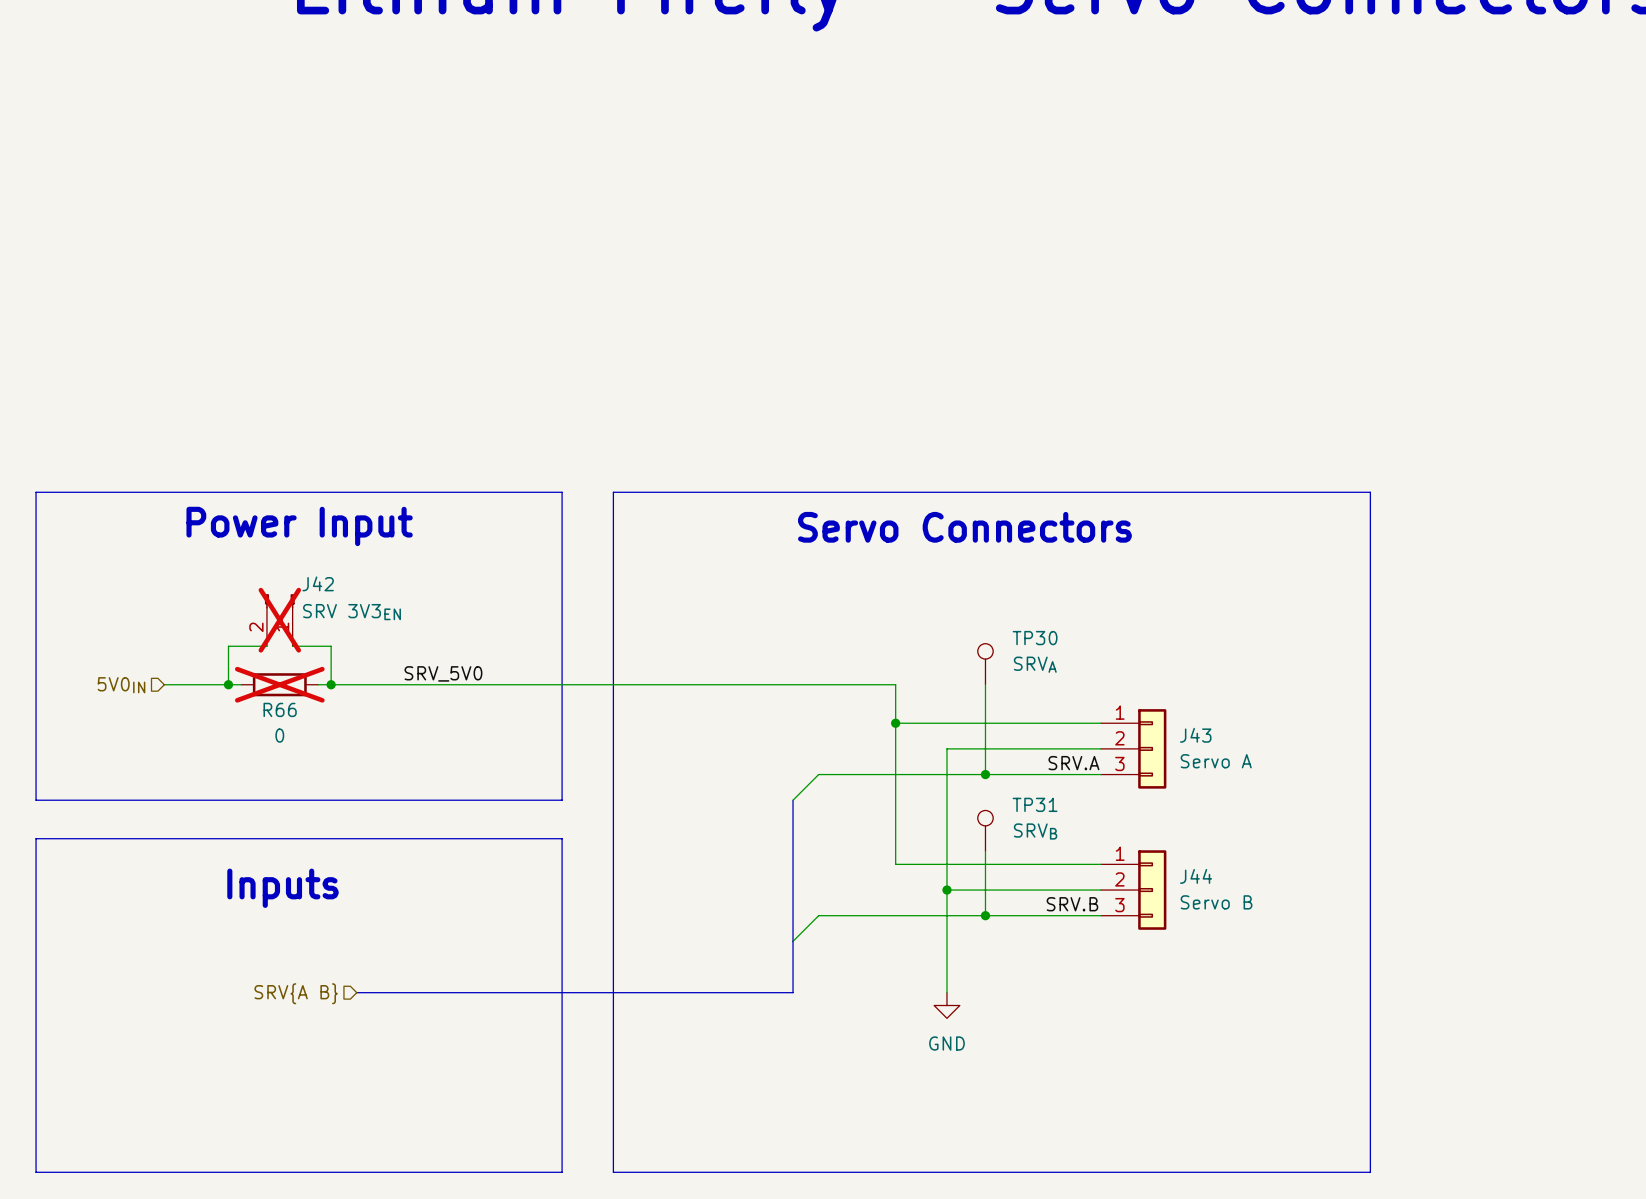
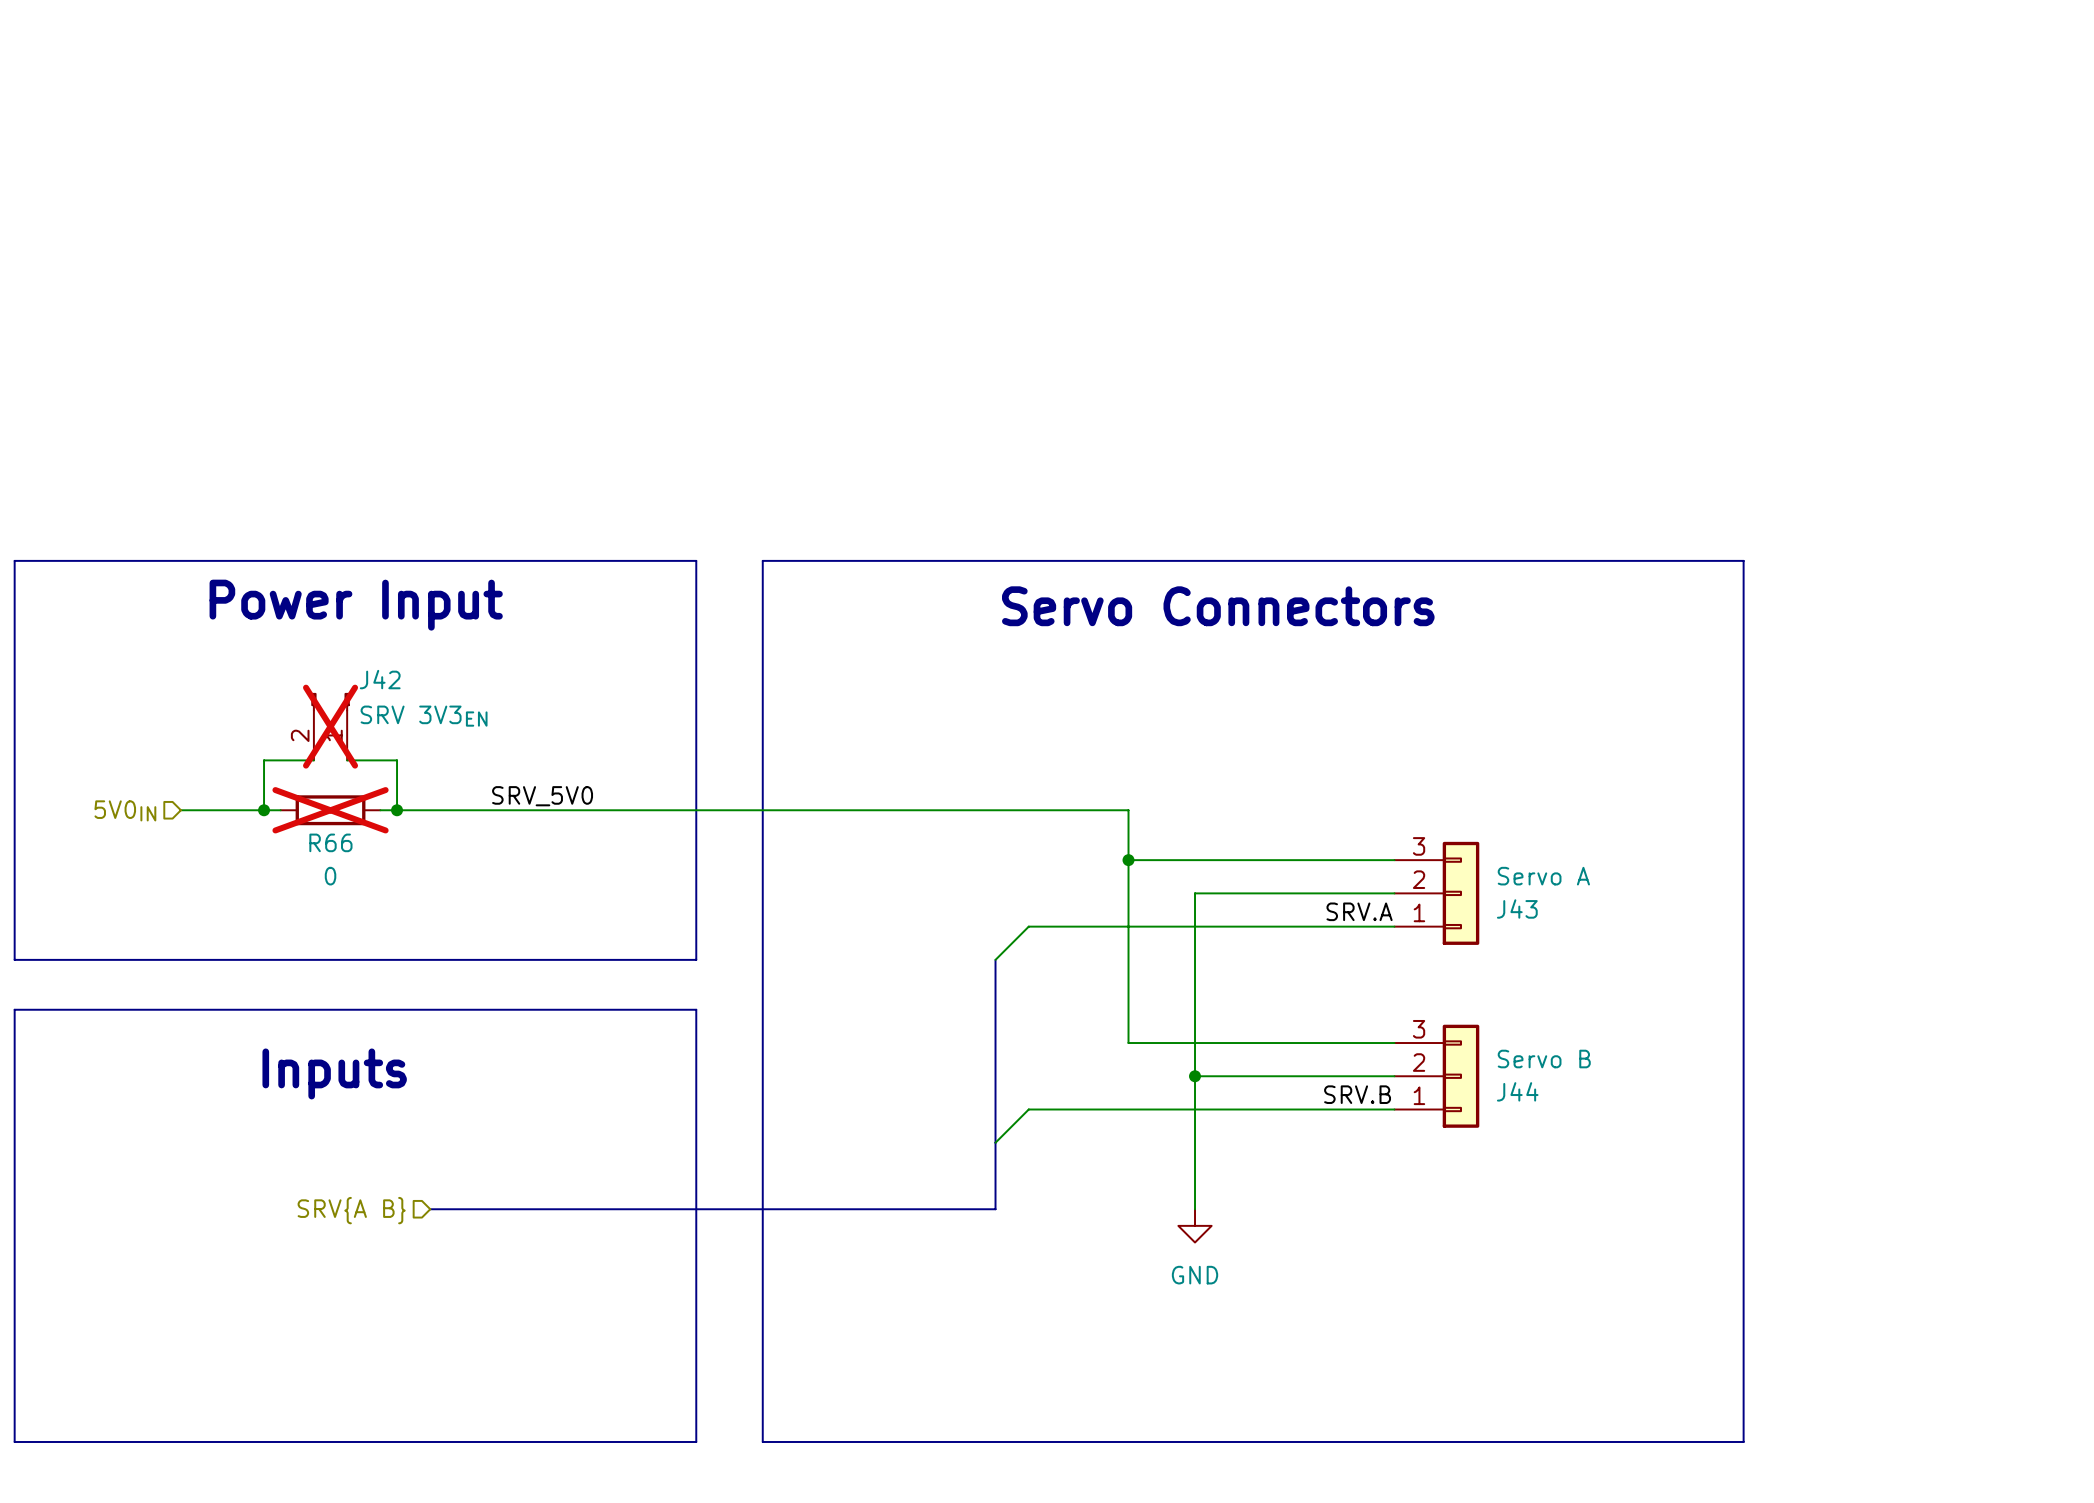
TP30: SRVA (985, 664) -> none
wire: (985, 684) (985, 774) -> none
J43 flip: as is (1152, 748) -> up-down (1461, 893)
junction: (985, 774) -> none
TP31: SRVB (985, 831) -> none
wire: (985, 851) (985, 915) -> none
J44 flip: as is (1152, 890) -> up-down (1461, 1076)
junction: (985, 915) -> none

